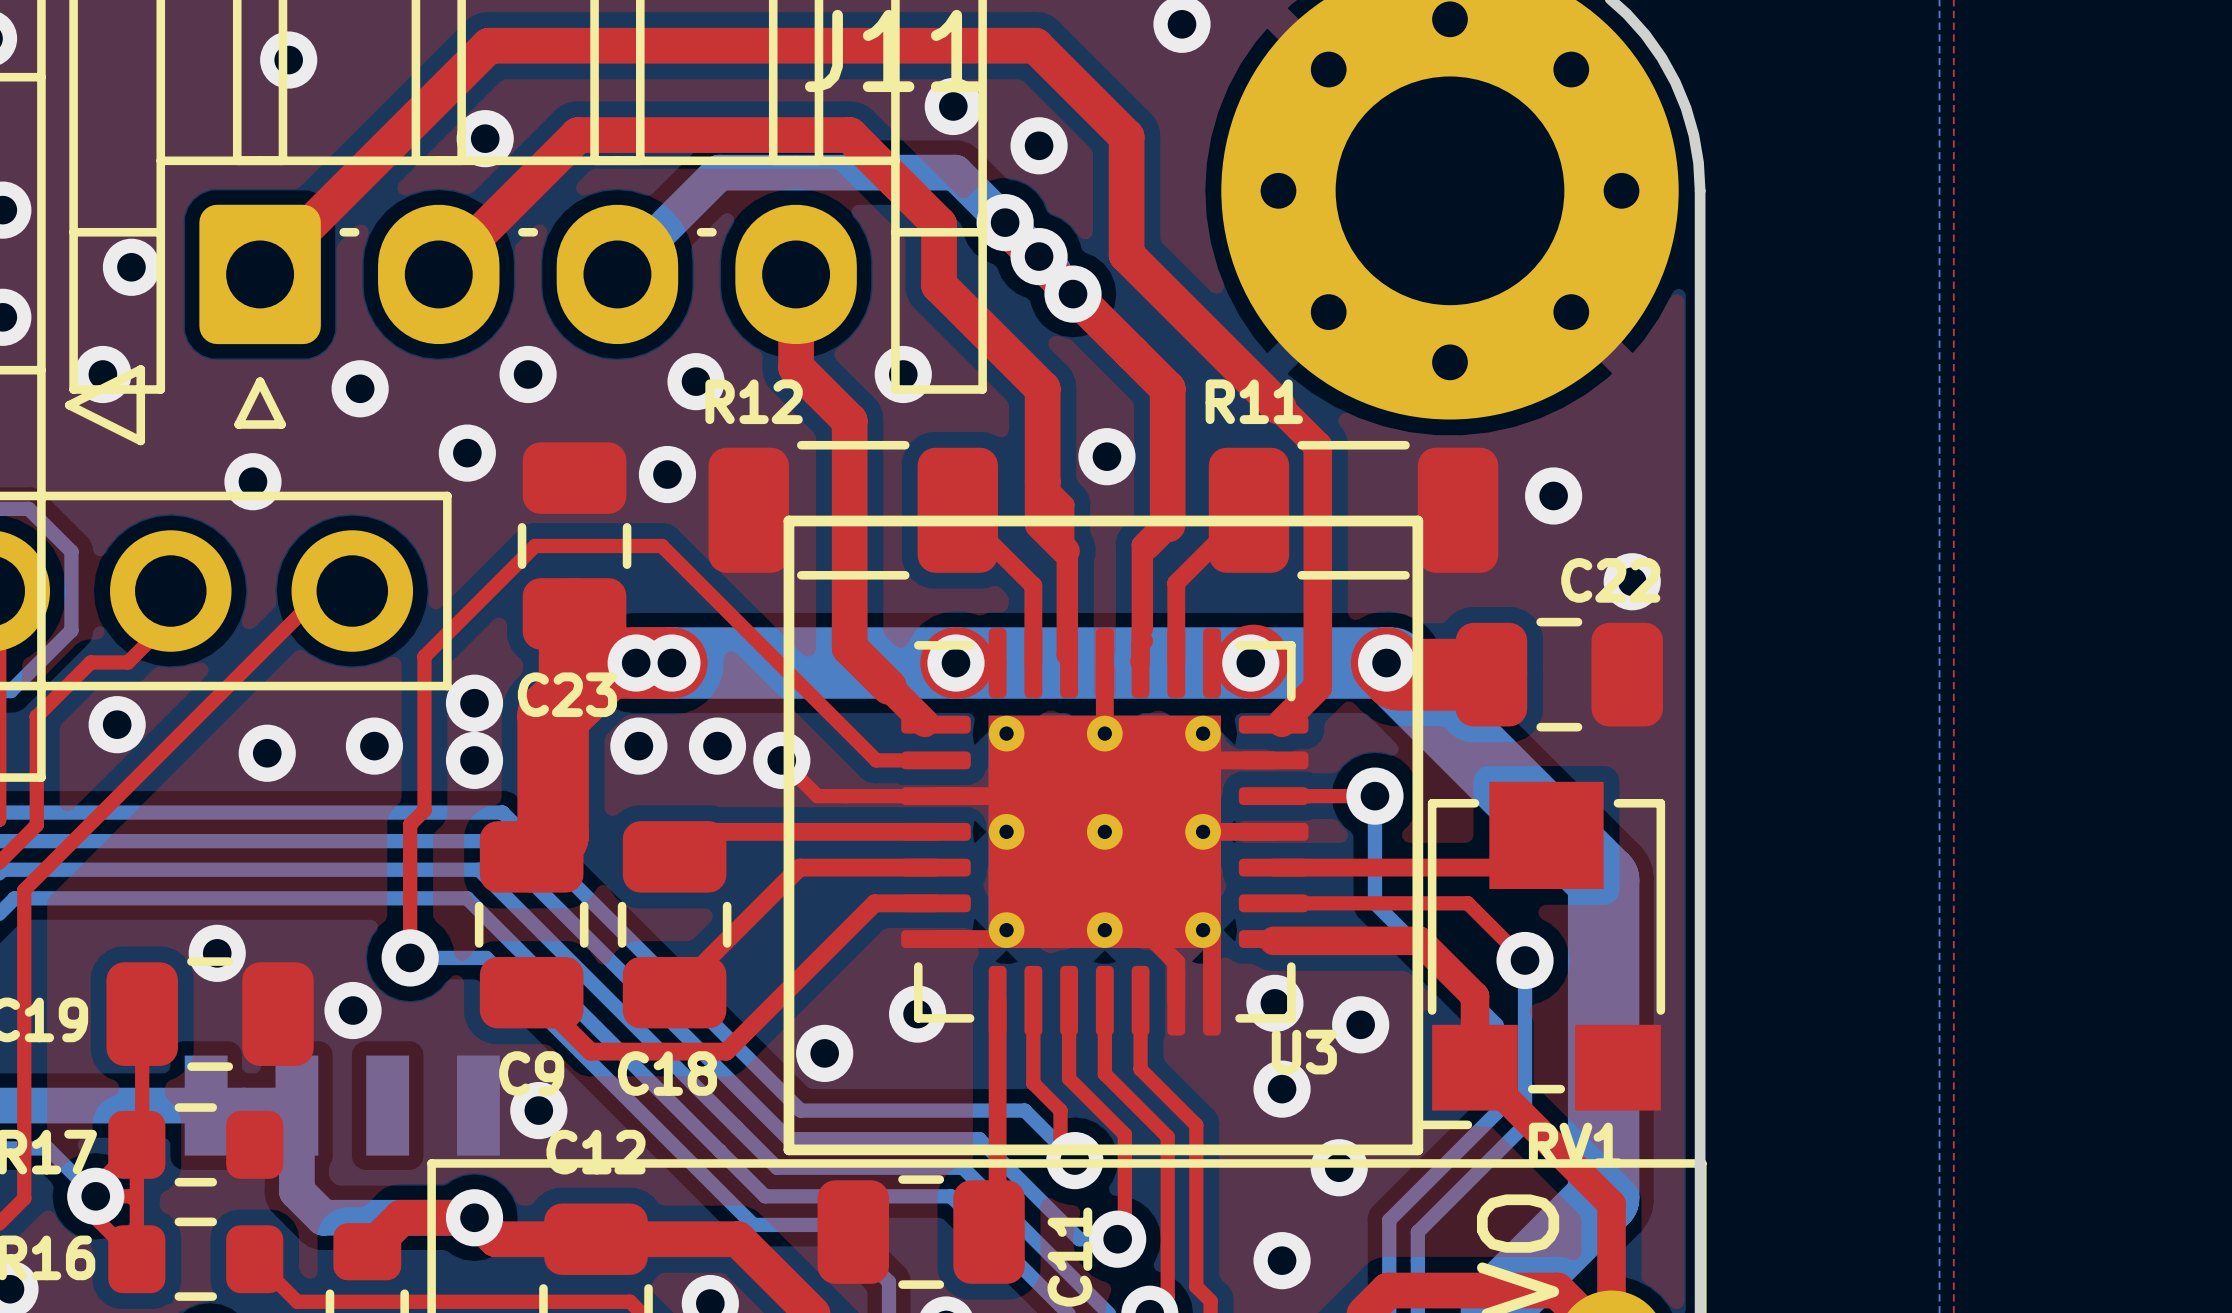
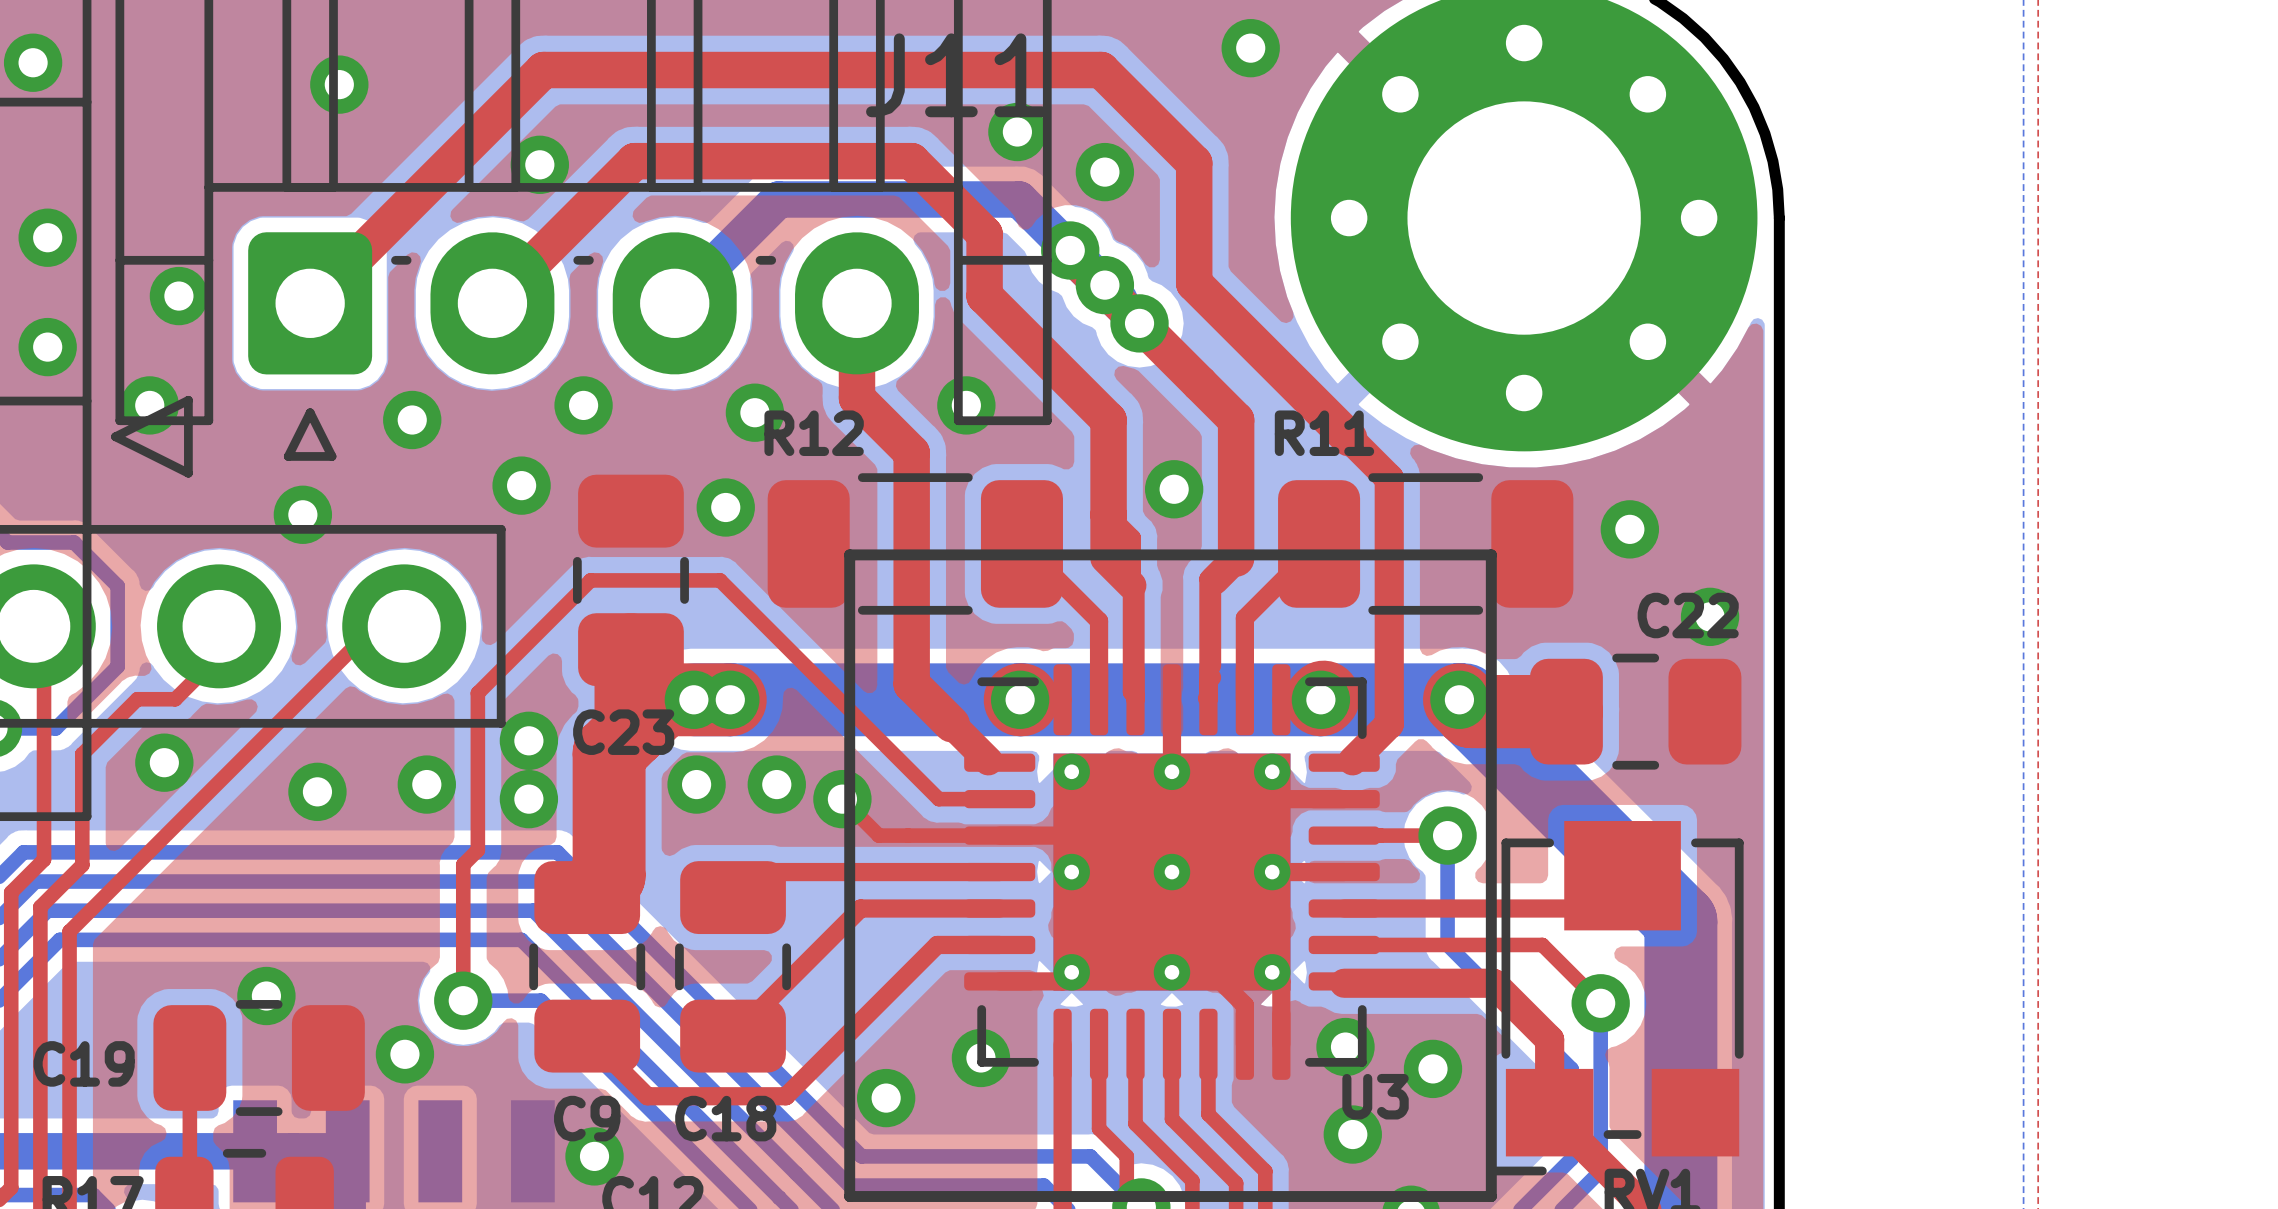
top track: (921, 206) (939, 224) (939, 285) -> (984, 234) (984, 296) (1002, 314)

